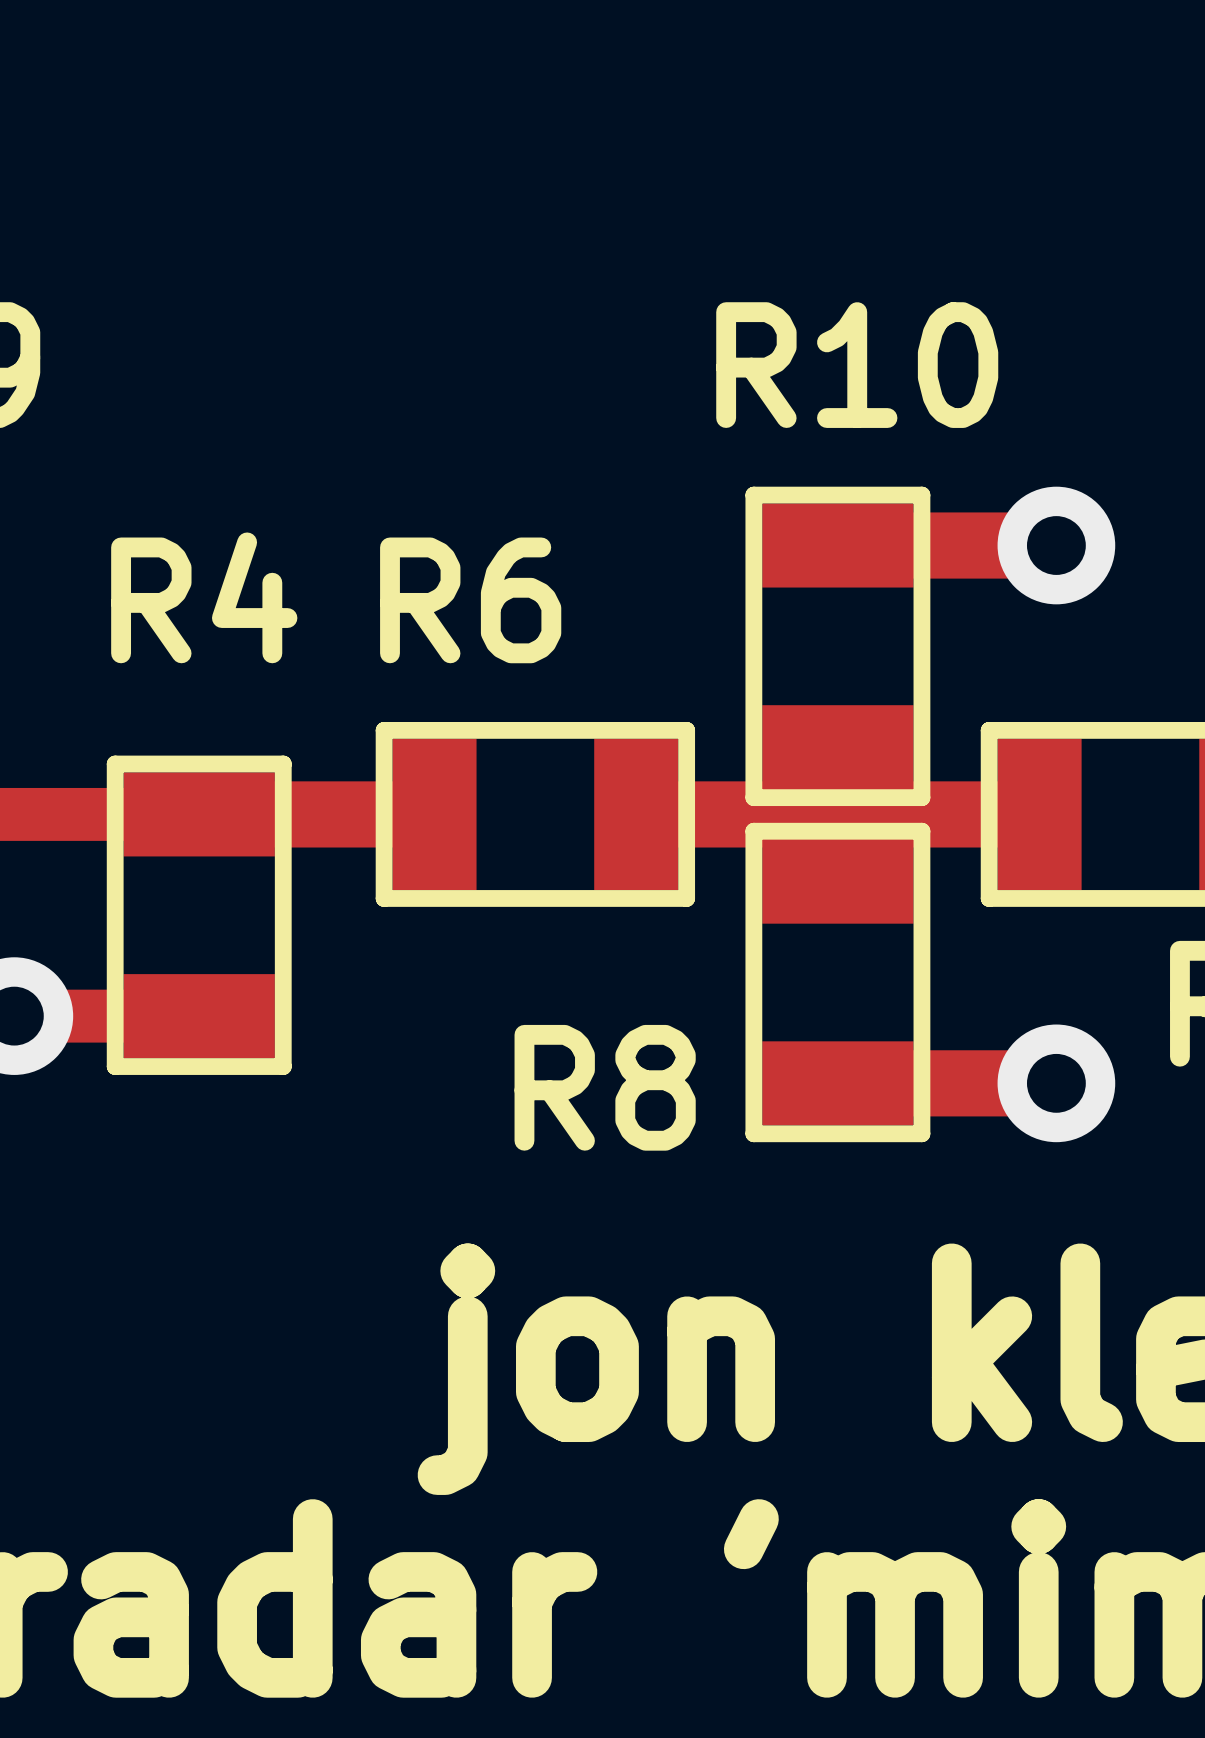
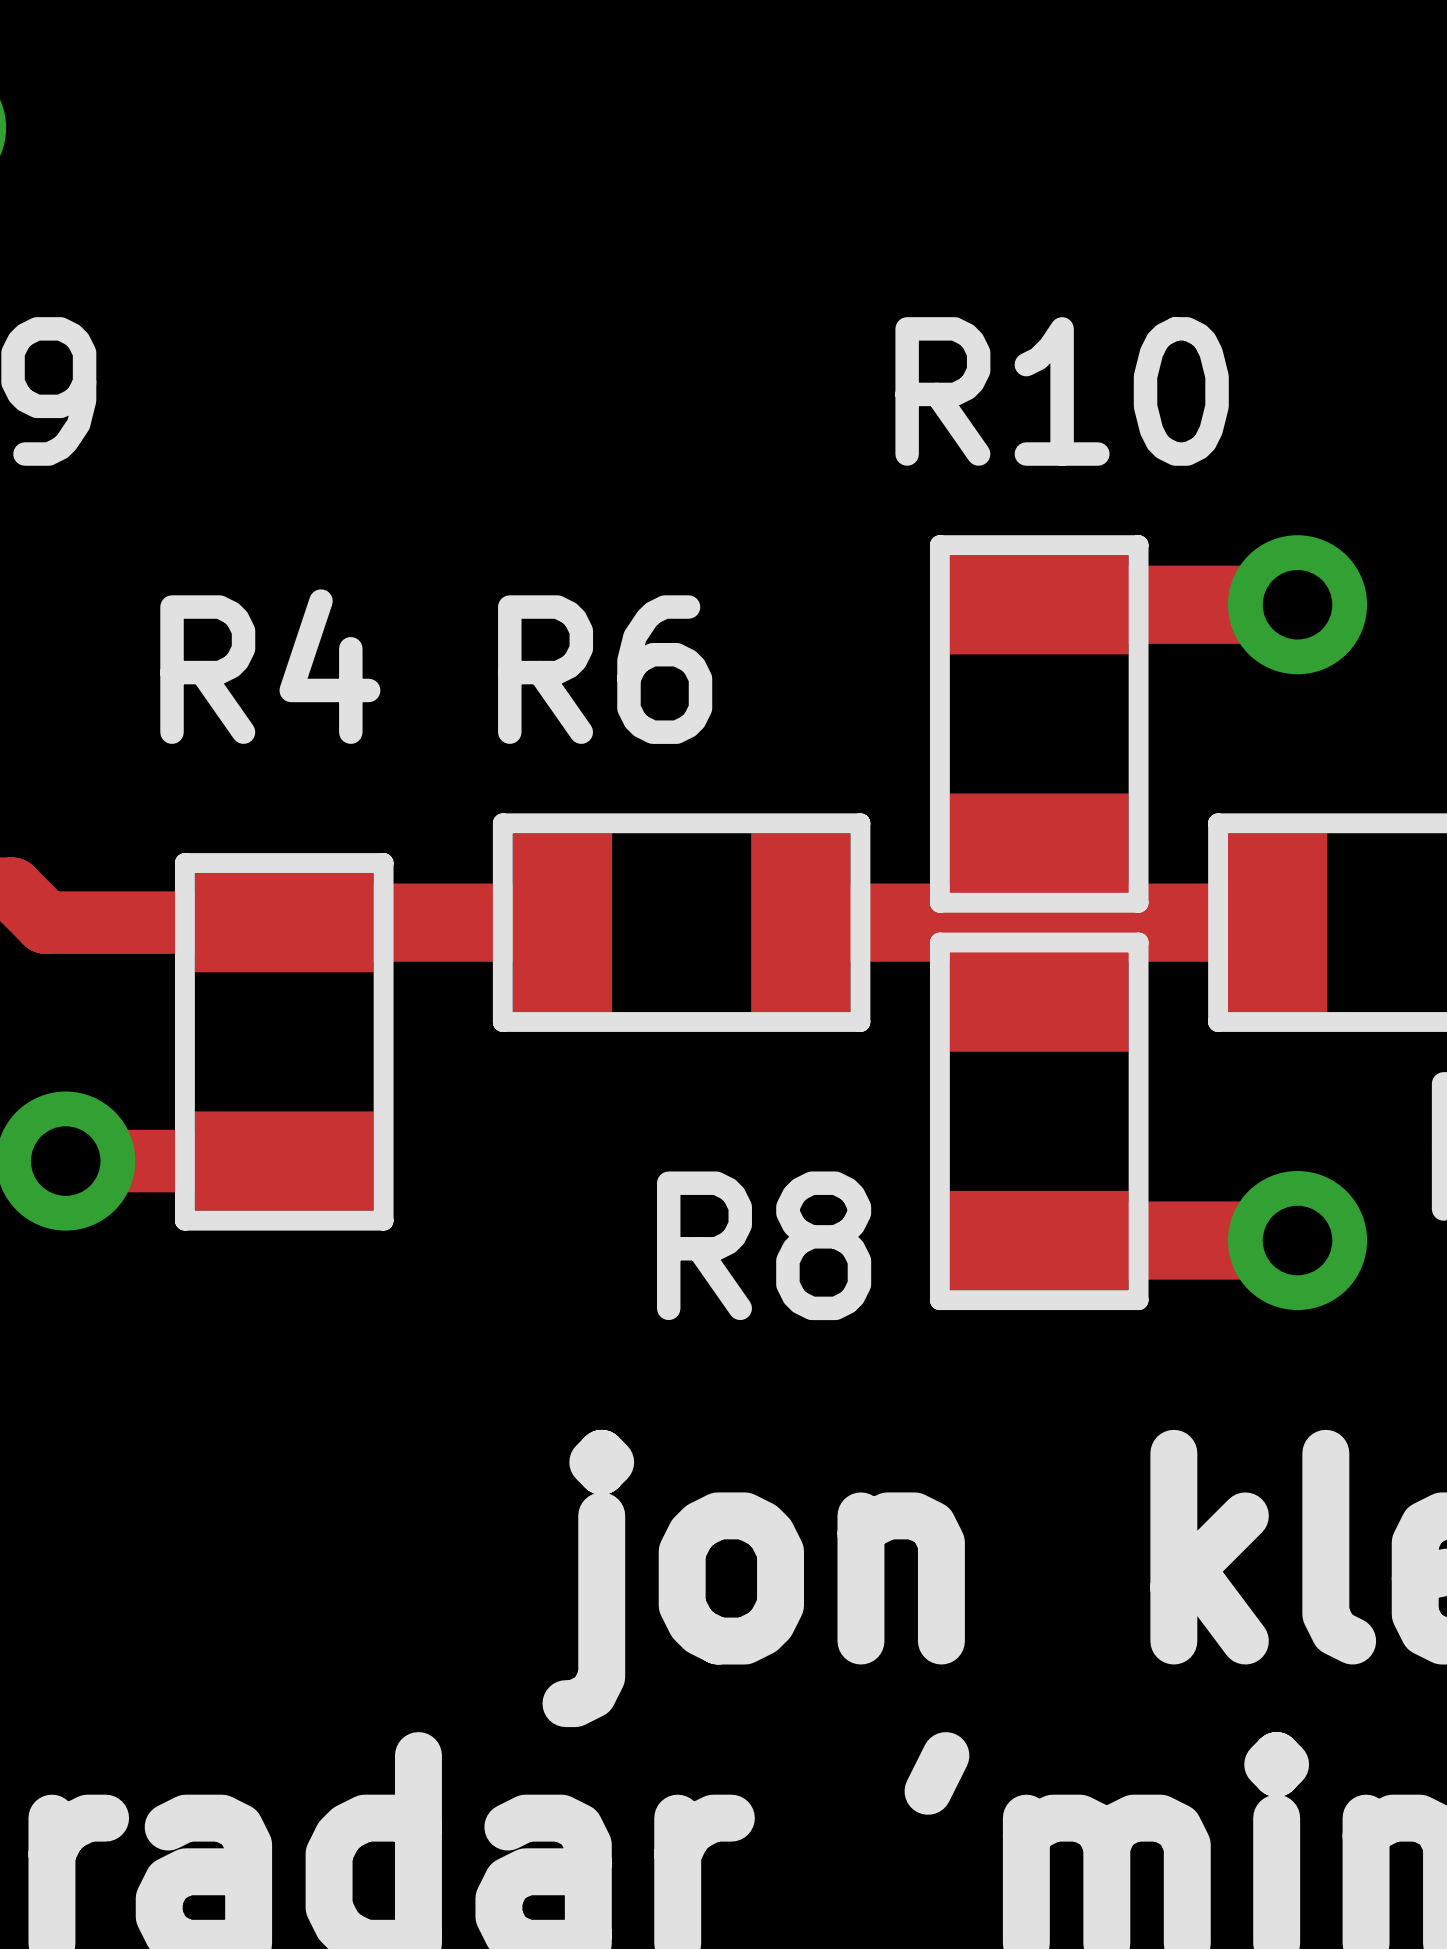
R4 name position: R4 (204, 597) -> R4 (270, 666)

